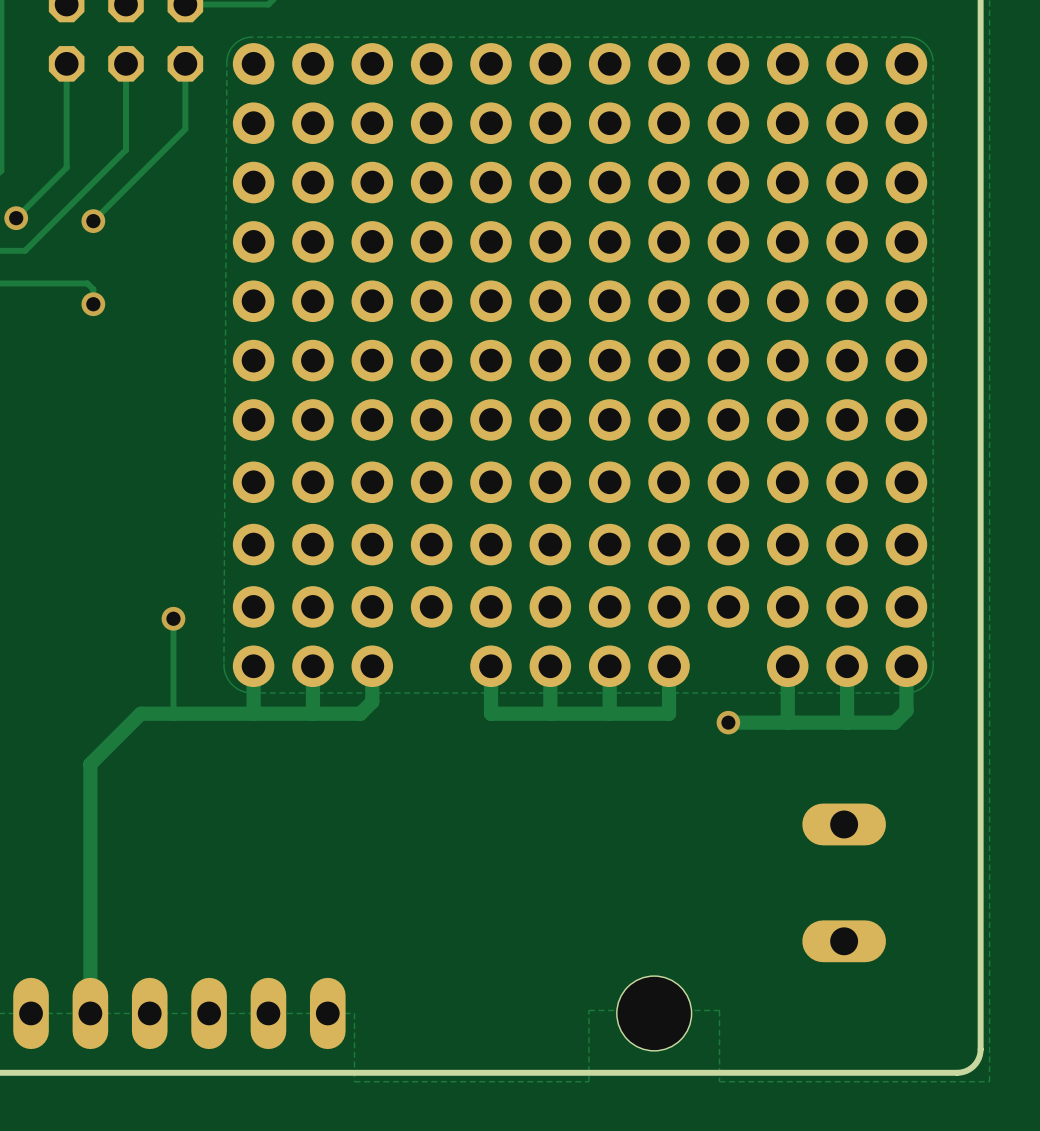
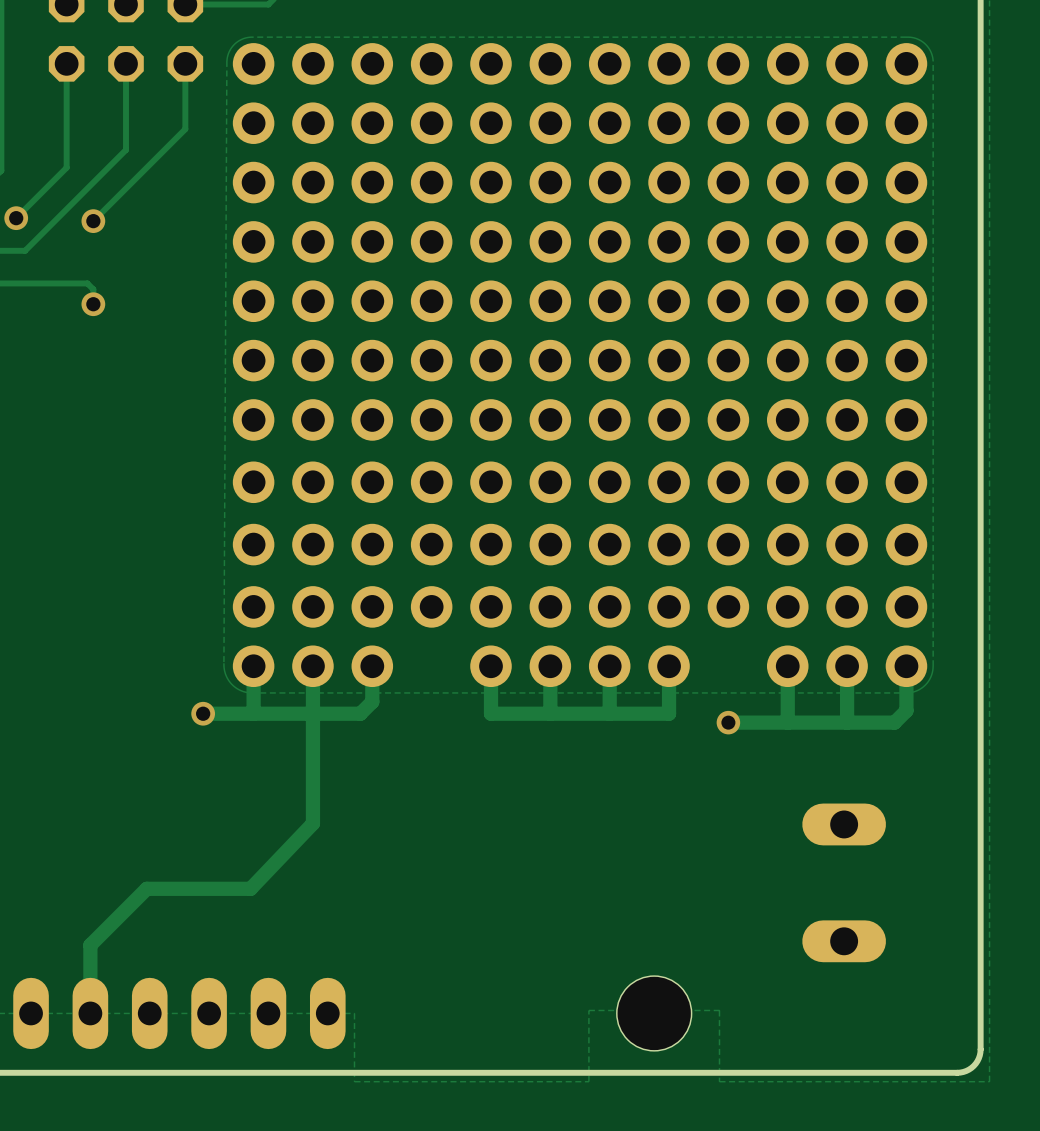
track: (173, 618) (173, 713) -> none
via position: (173, 618) -> (203, 713)
track: (203, 713) (140, 713) (90, 764) (90, 945) -> (312, 713) (312, 823) (250, 888) (146, 888) (90, 945)

